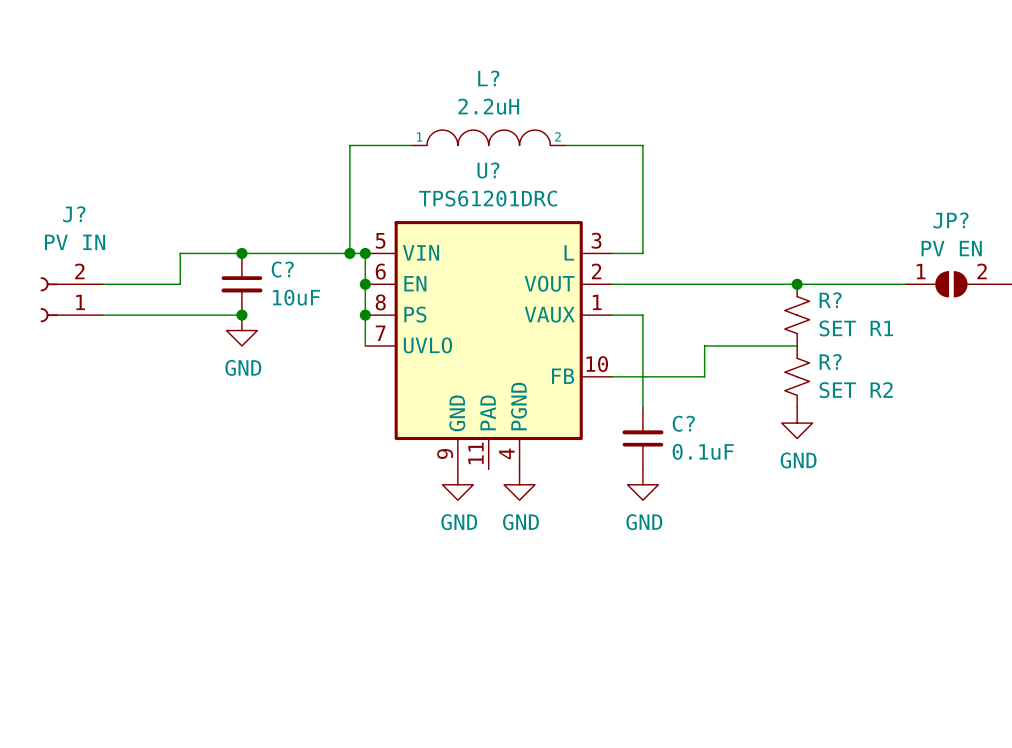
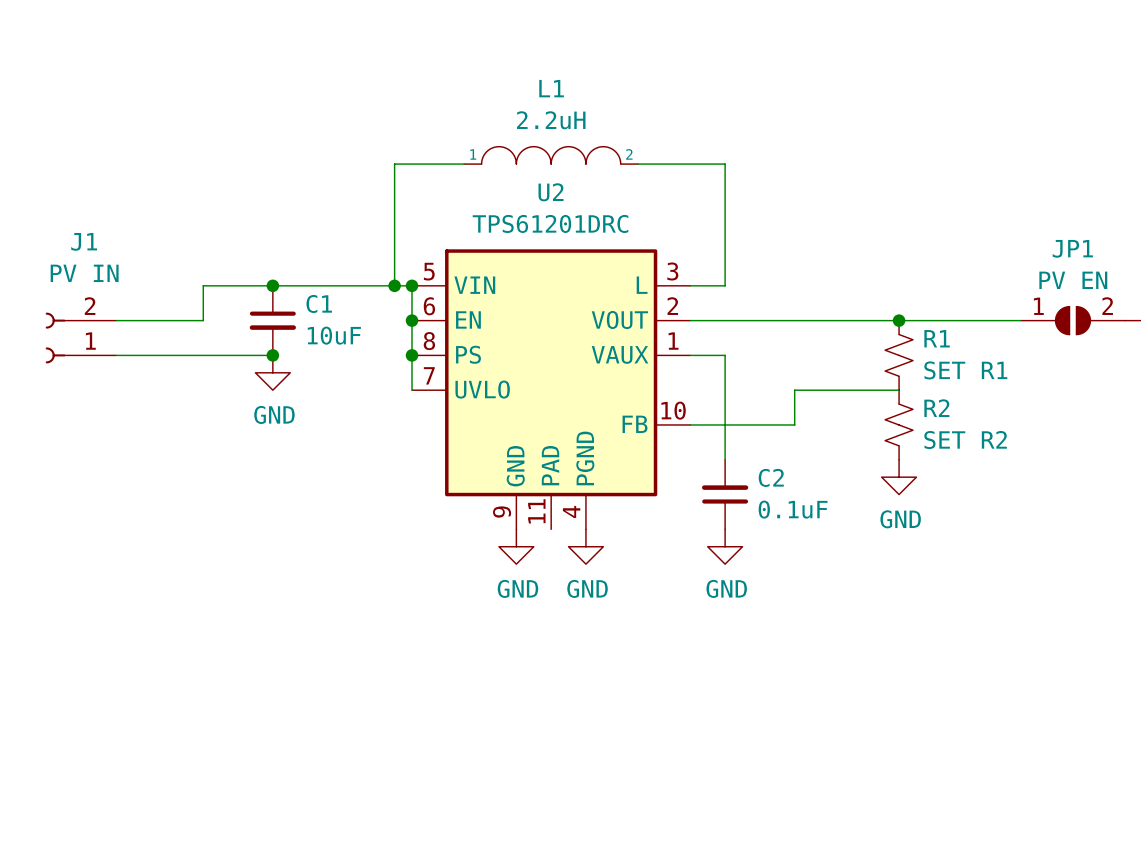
L? name: L? (488, 78) -> L1 (551, 88)
U? name: U? (488, 170) -> U2 (551, 192)
J? name: J? (74, 214) -> J1 (84, 241)
JP? name: JP? (950, 220) -> JP1 (1072, 248)
C? name: C? (282, 269) -> C1 (319, 303)
R? name: R? (830, 300) -> R1 (937, 338)
R? name: R? (830, 361) -> R2 (936, 408)
C? name: C? (683, 423) -> C2 (771, 477)

